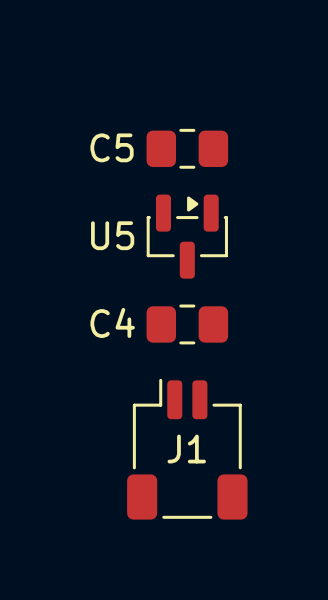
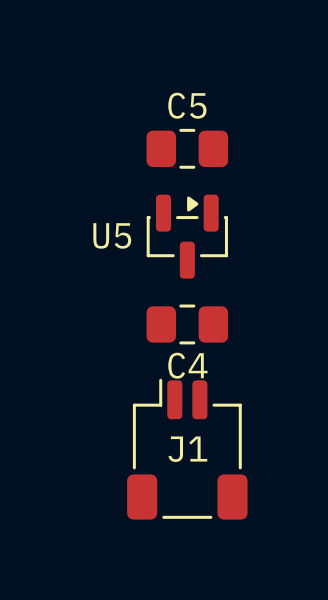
C5 name position: C5 (112, 147) -> C5 (187, 105)
C4 name position: C4 (112, 322) -> C4 (187, 365)

